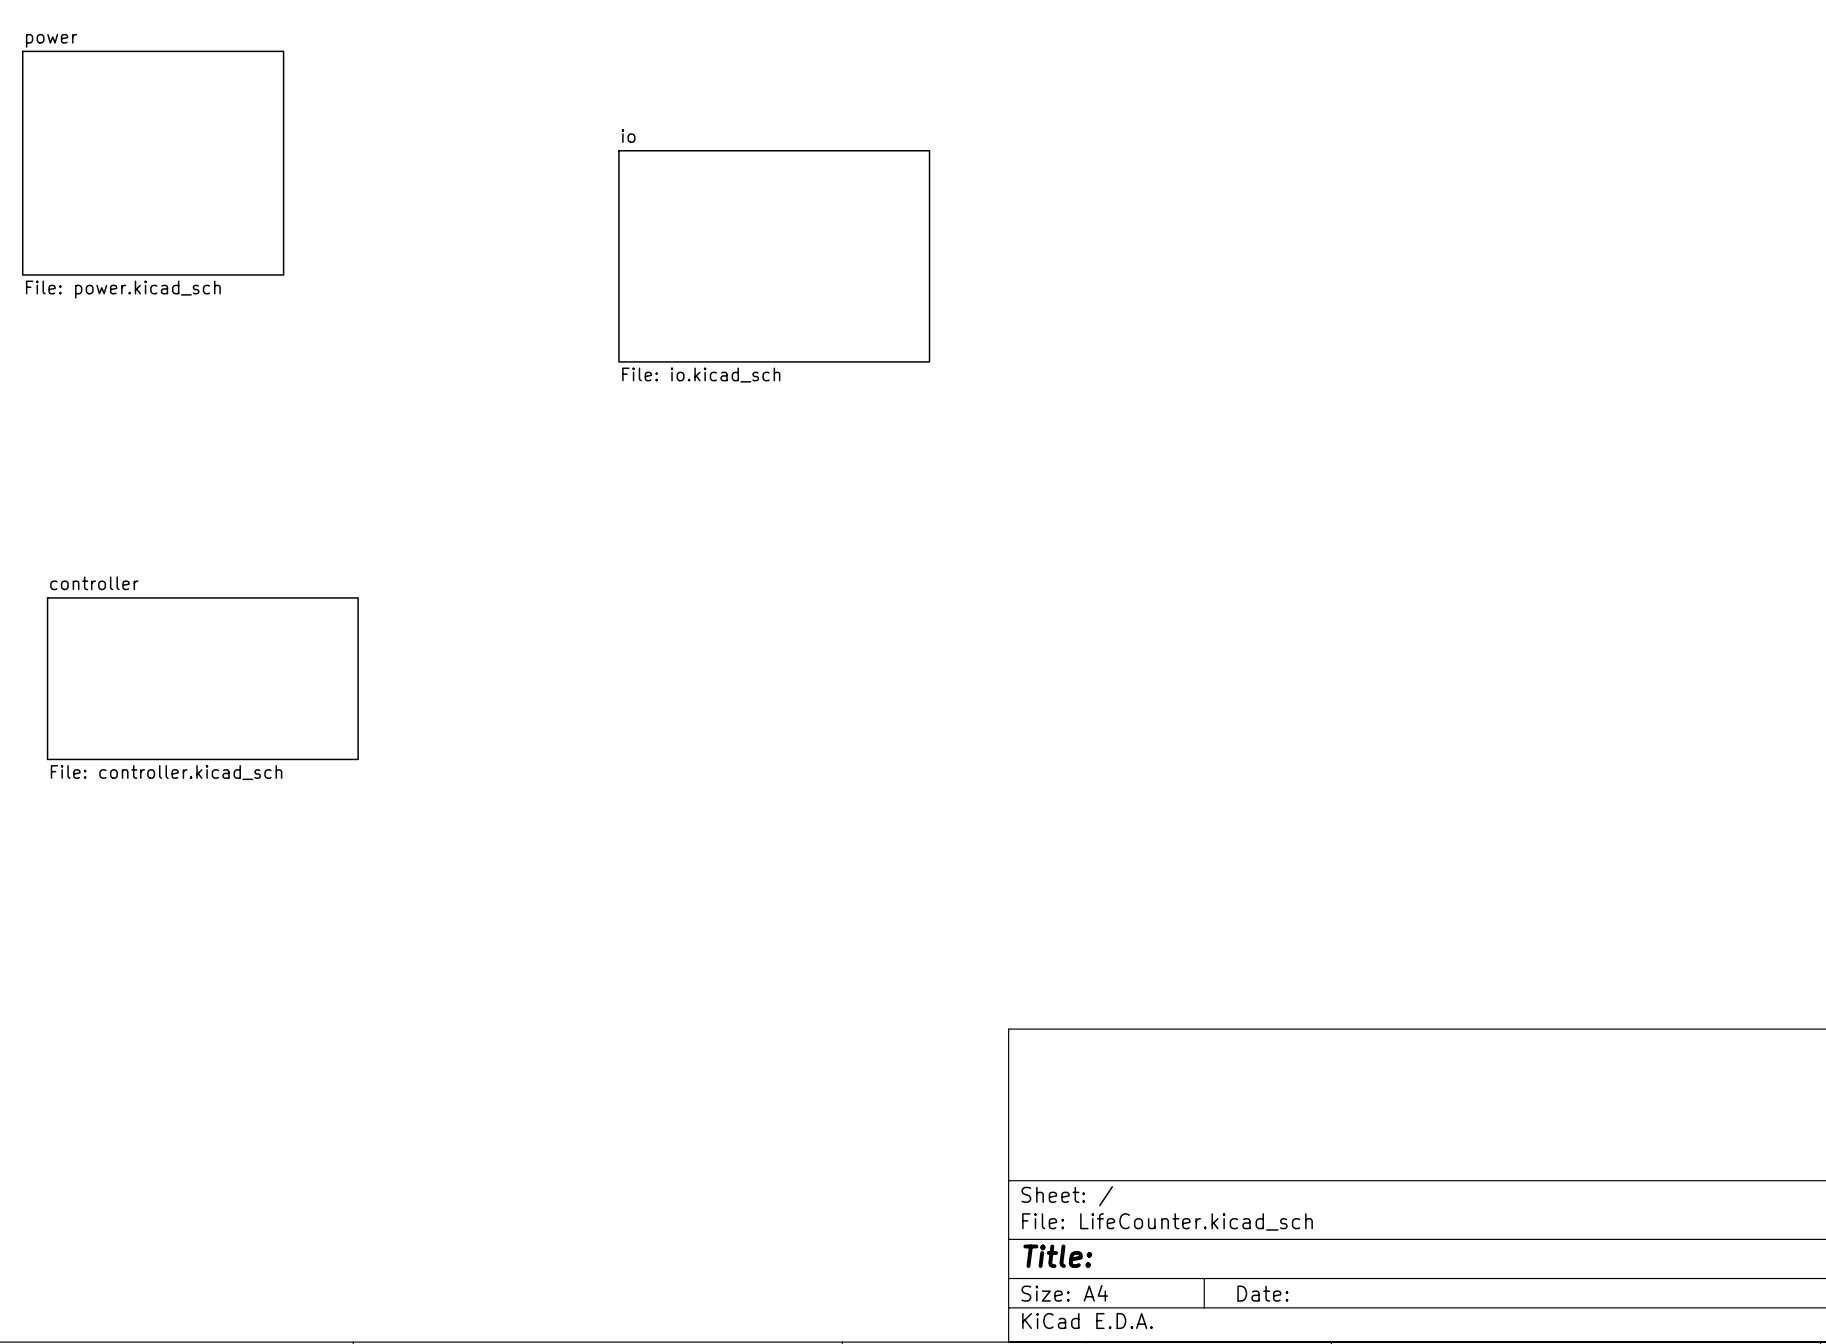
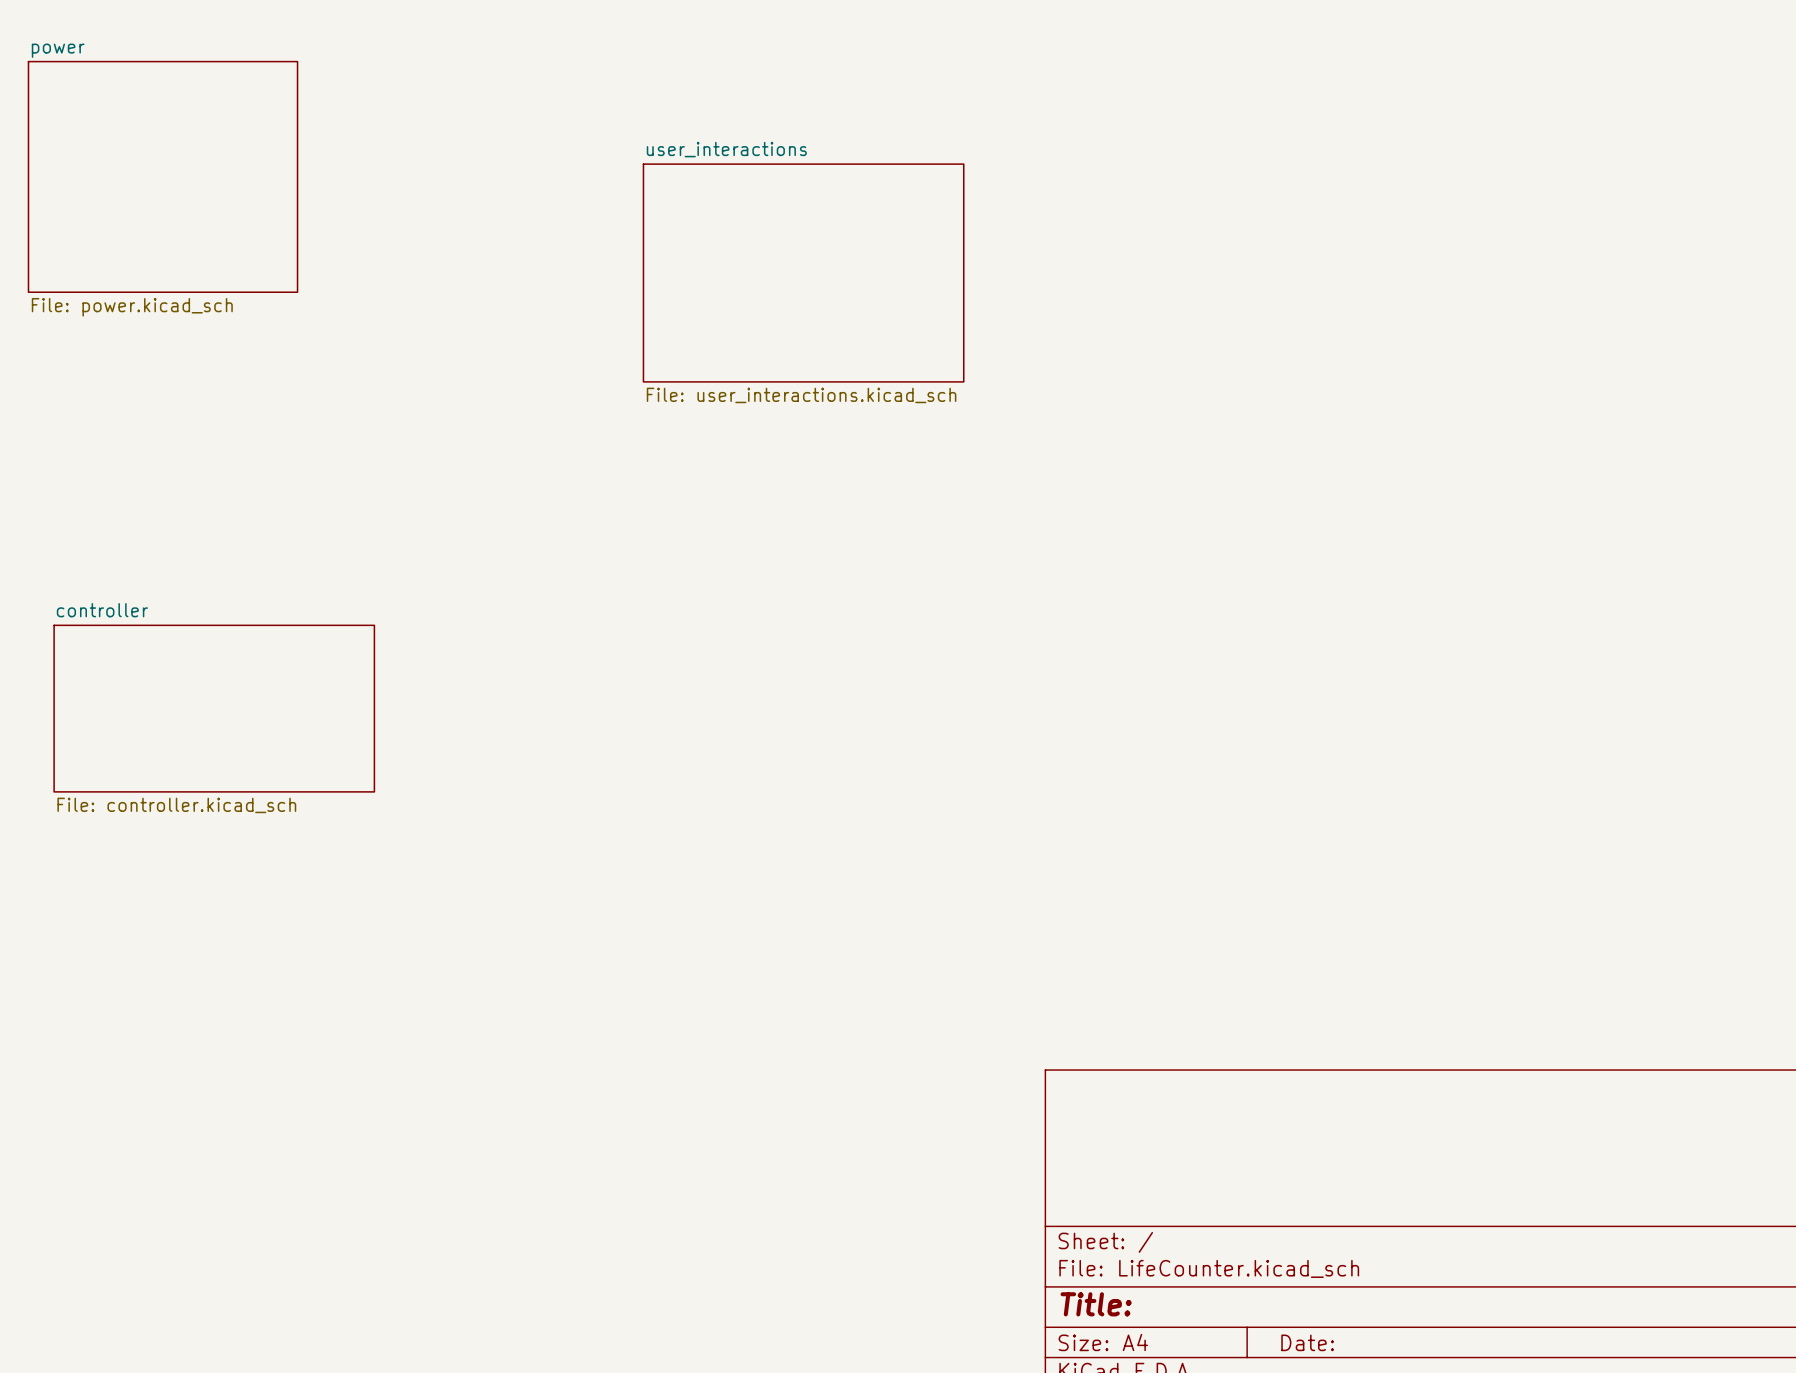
sheet io name: io (628, 136) -> user_interactions (726, 149)
sheet io value: File: io.kicad_sch (701, 375) -> File: user_interactions.kicad_sch (801, 395)

